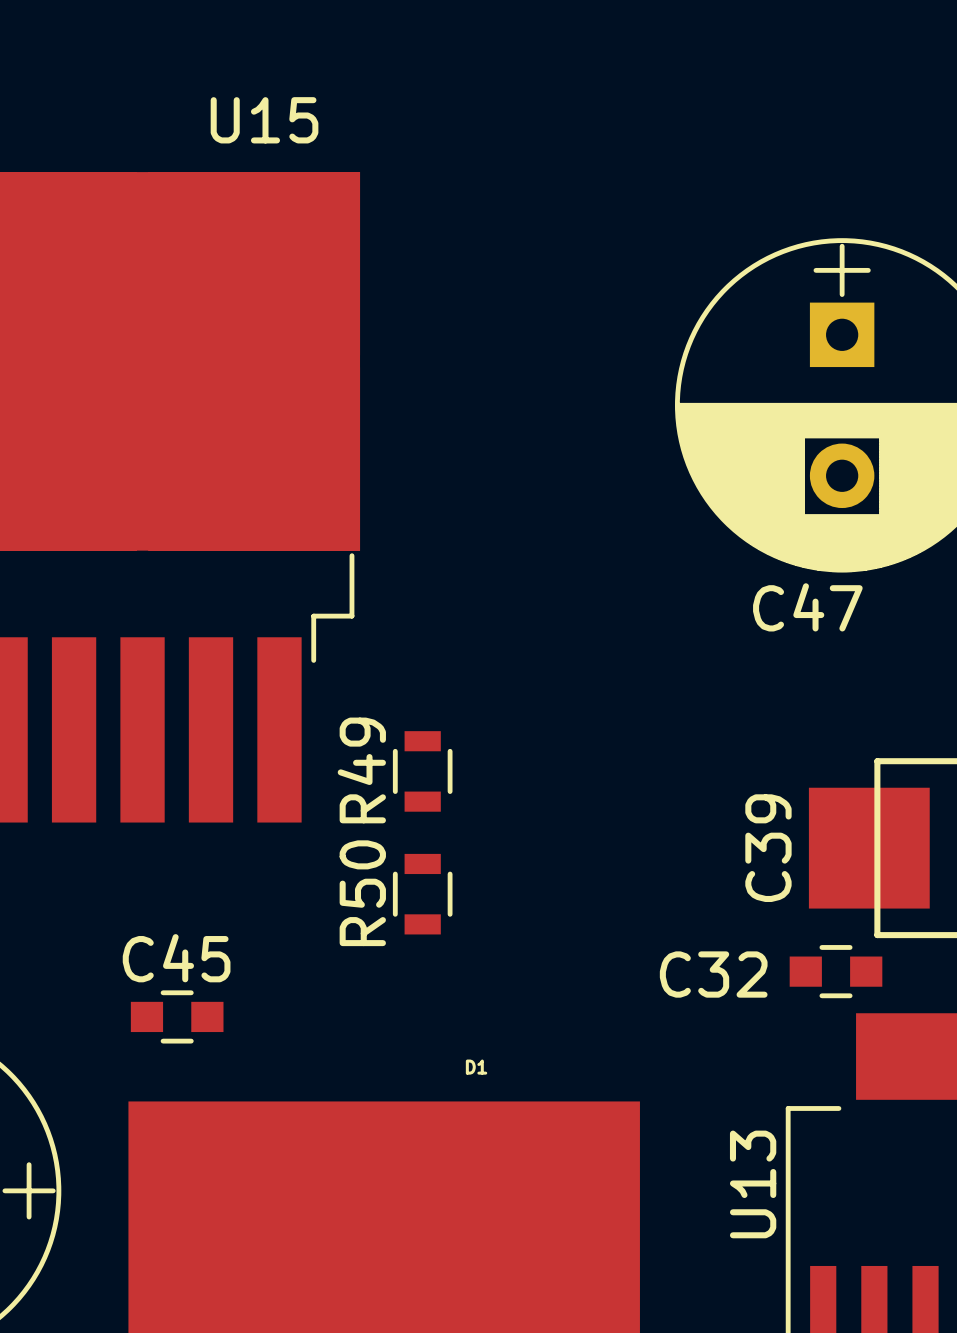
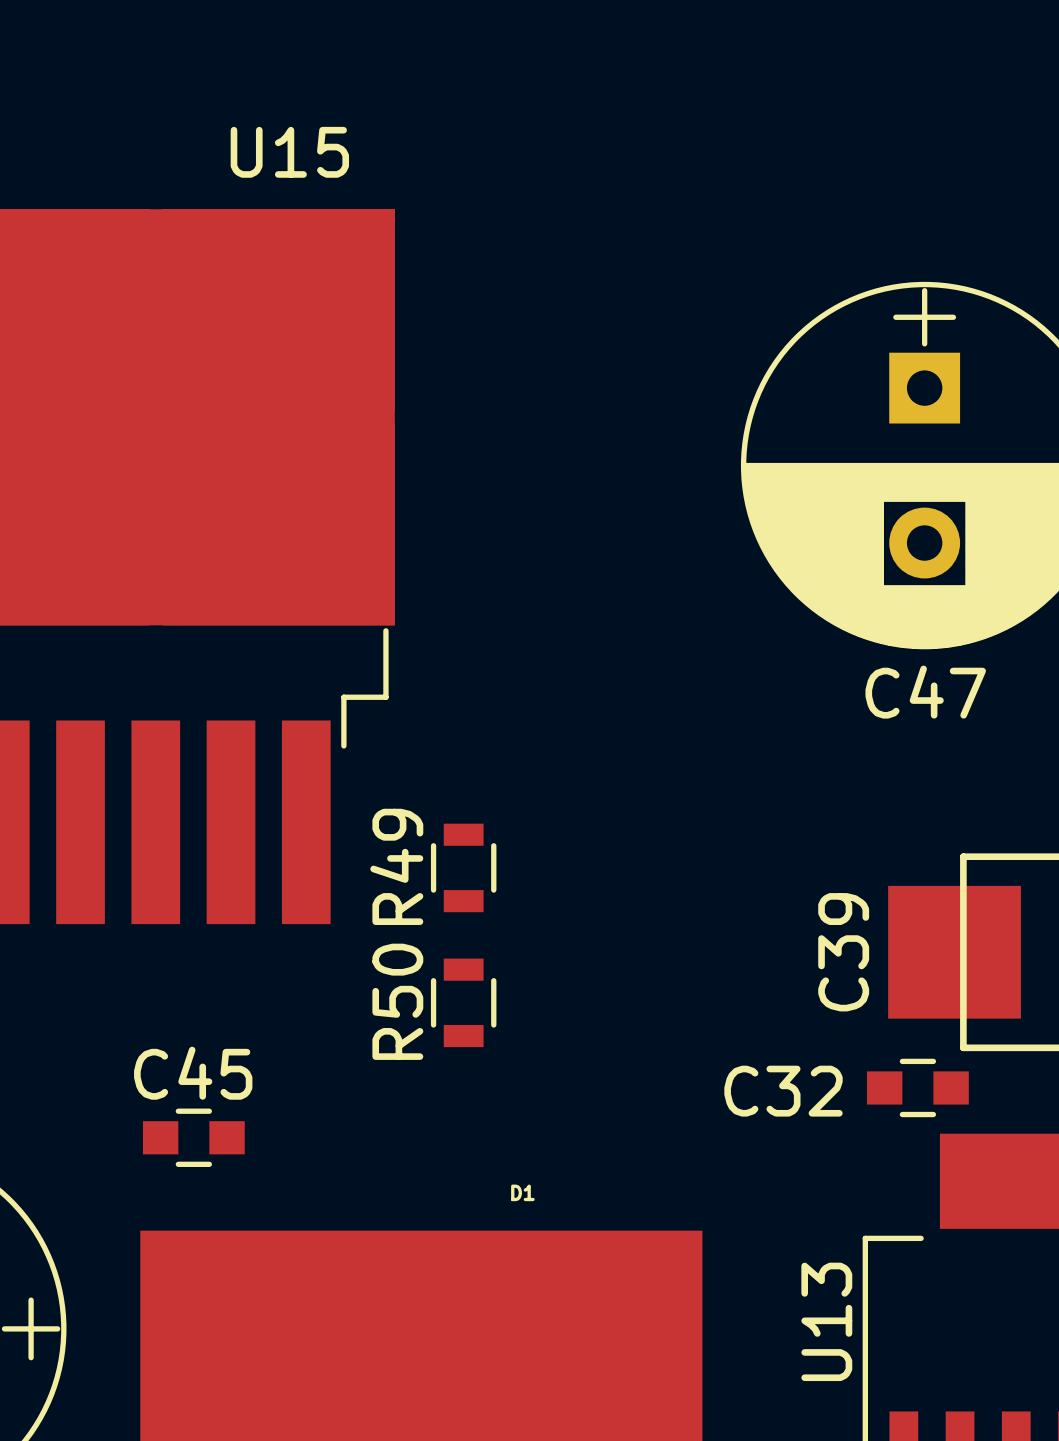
C47 name position: C47 (807, 607) -> C47 (925, 692)

